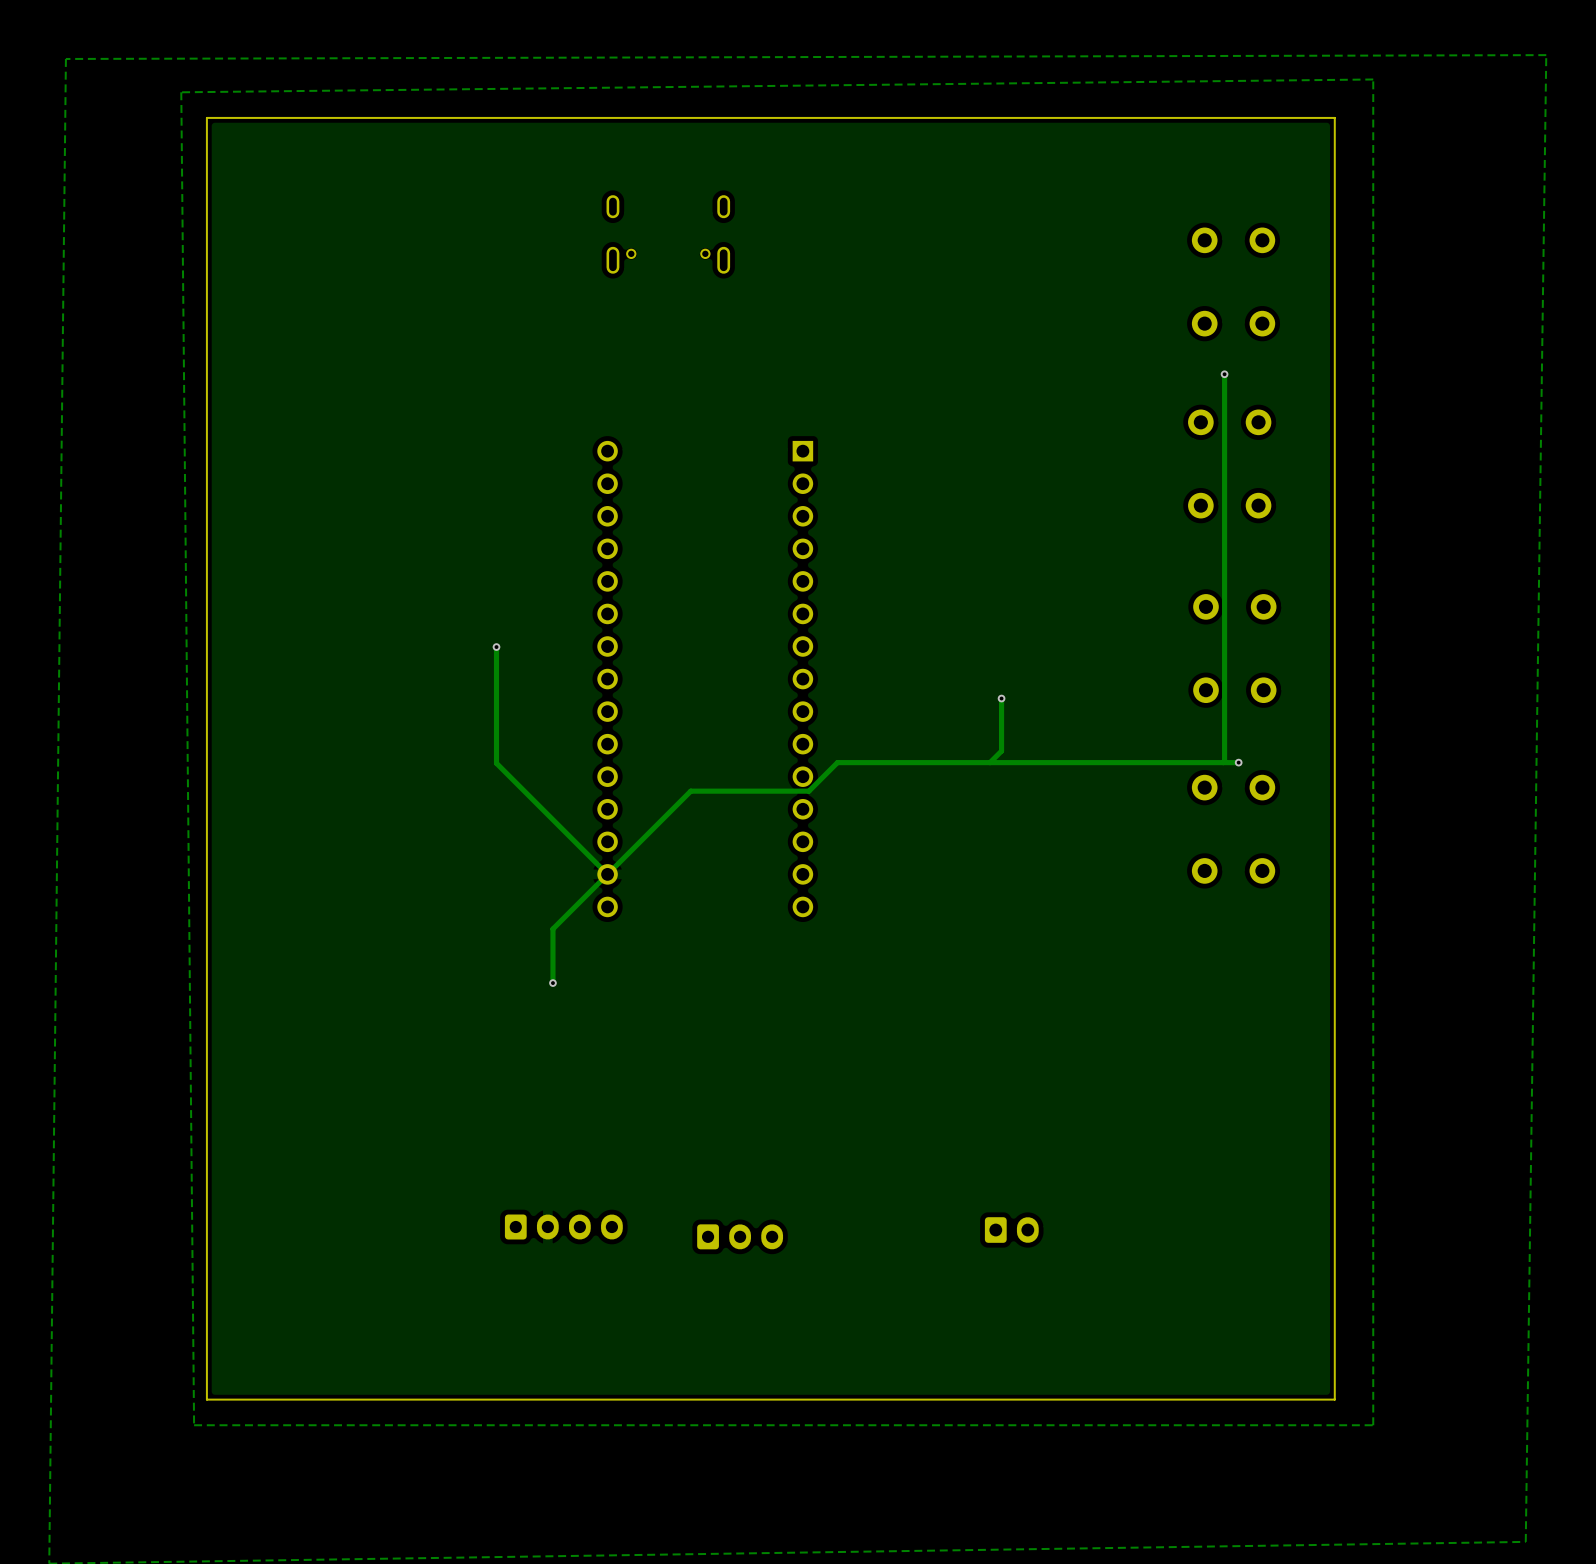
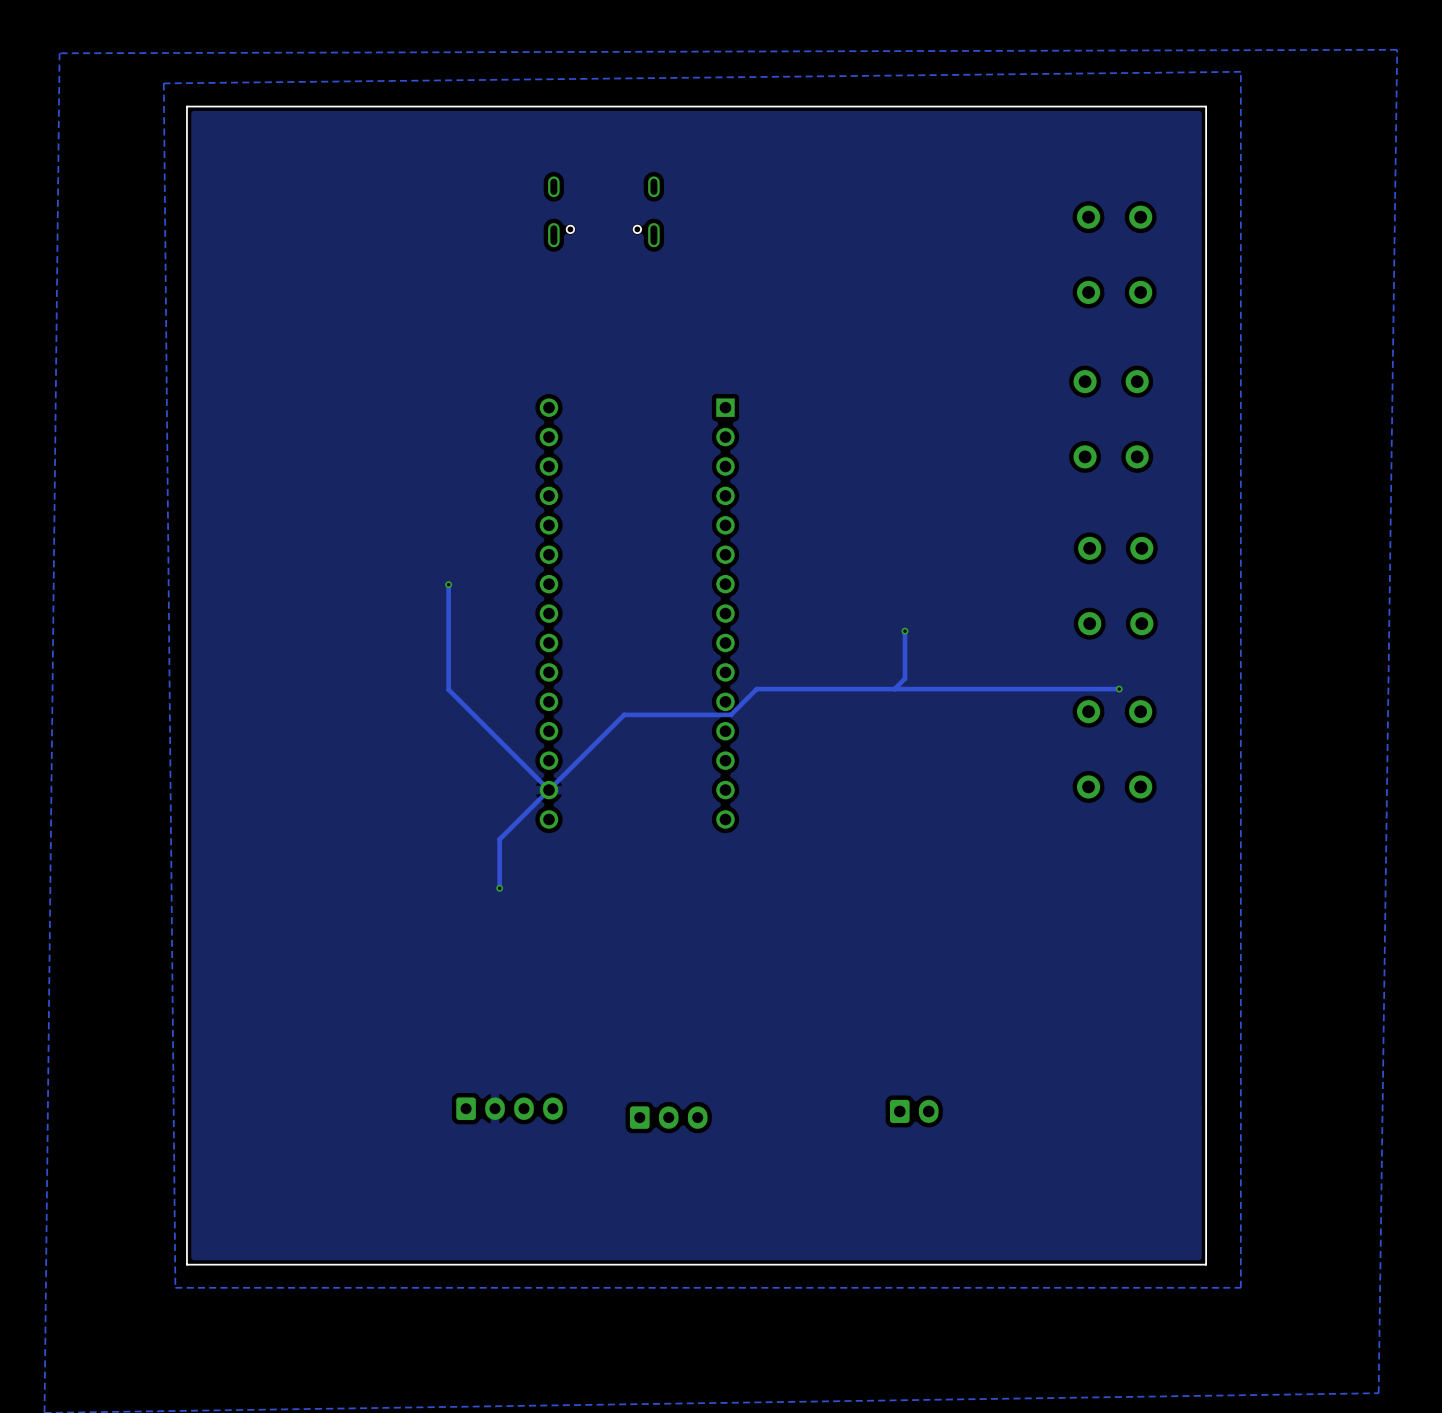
track: (1224, 374) (1223, 762) -> none
via: (1224, 374) -> none

